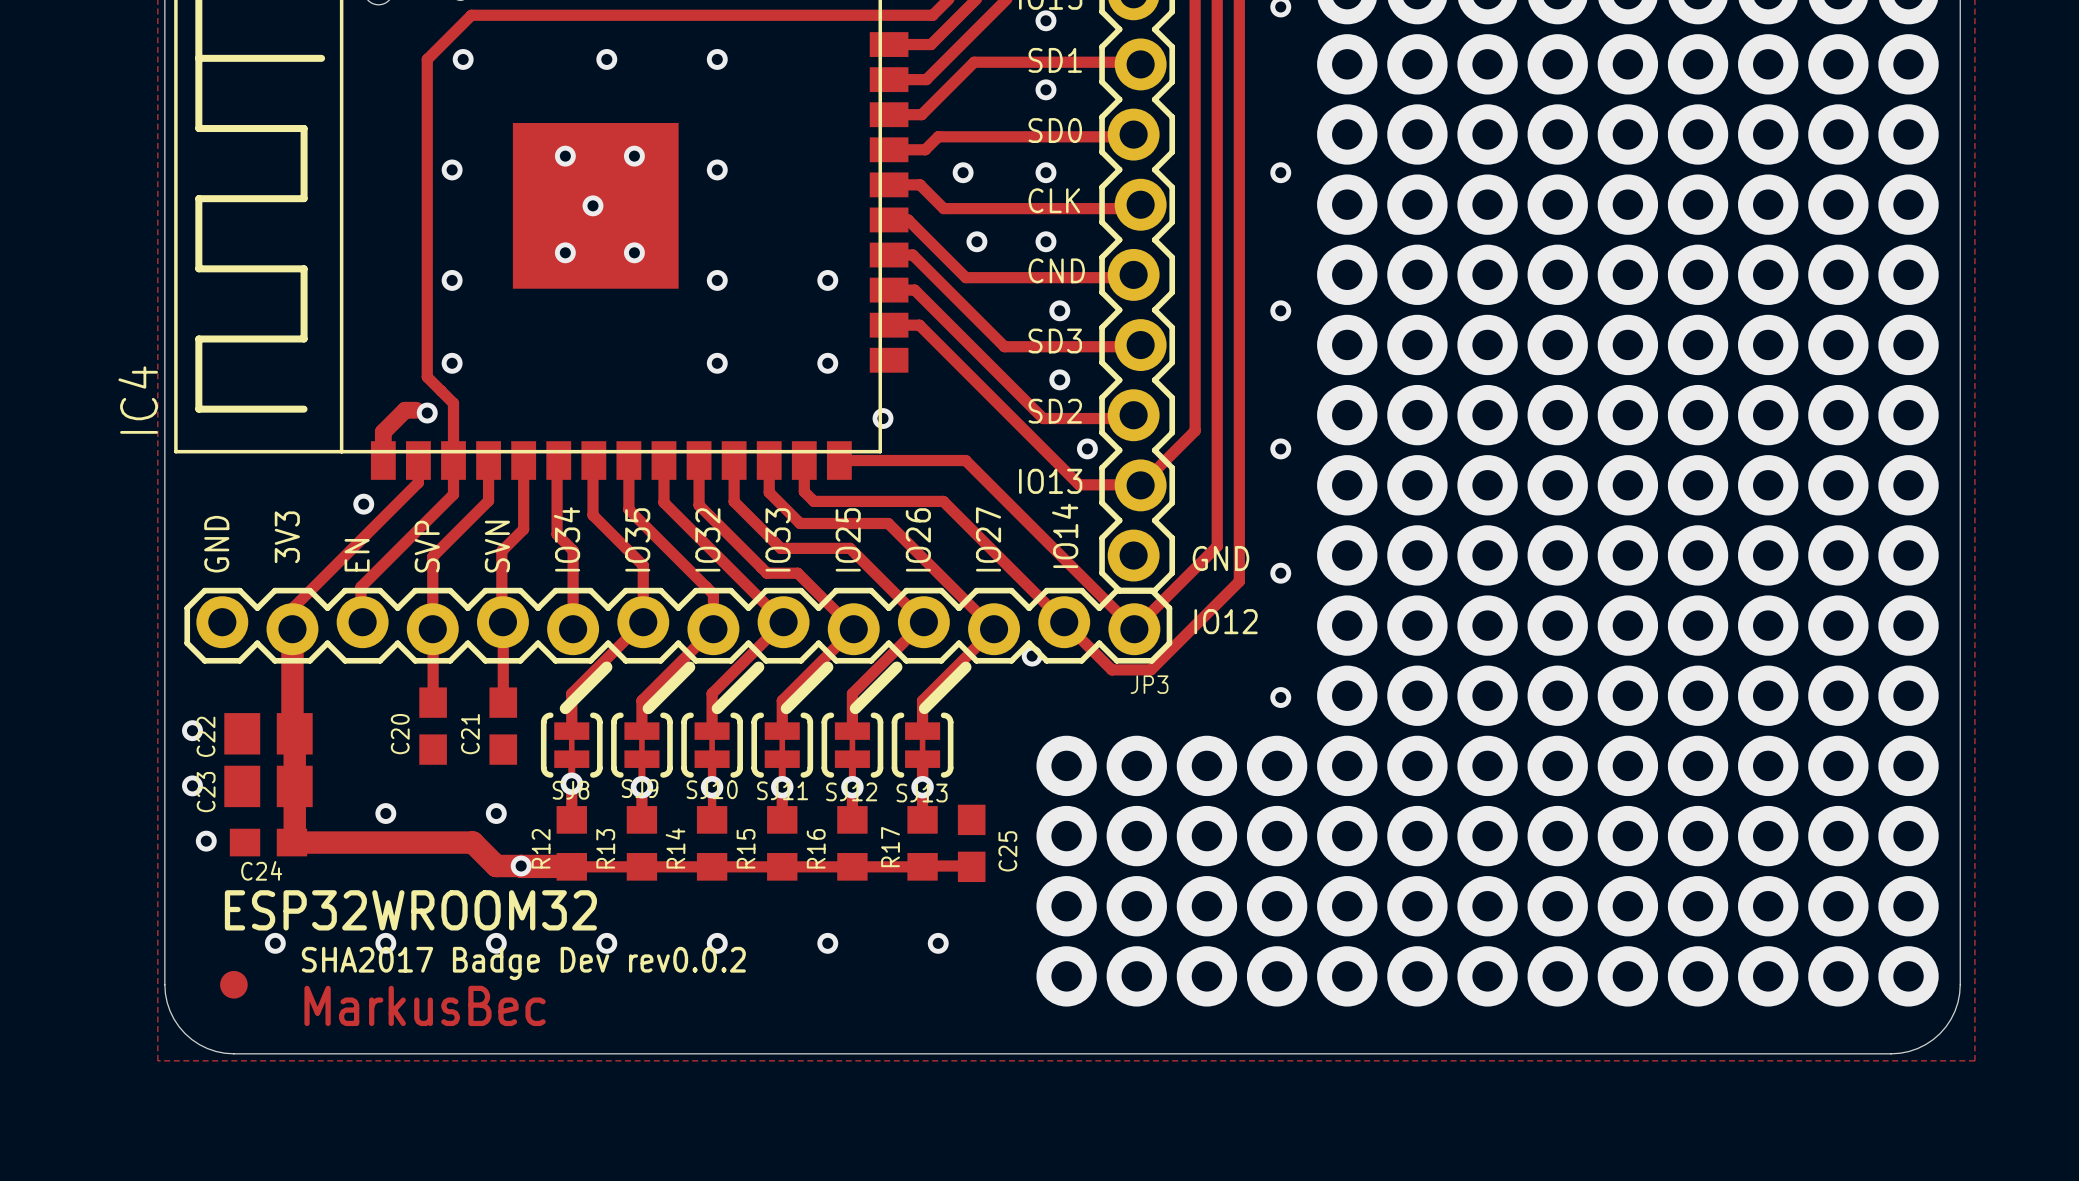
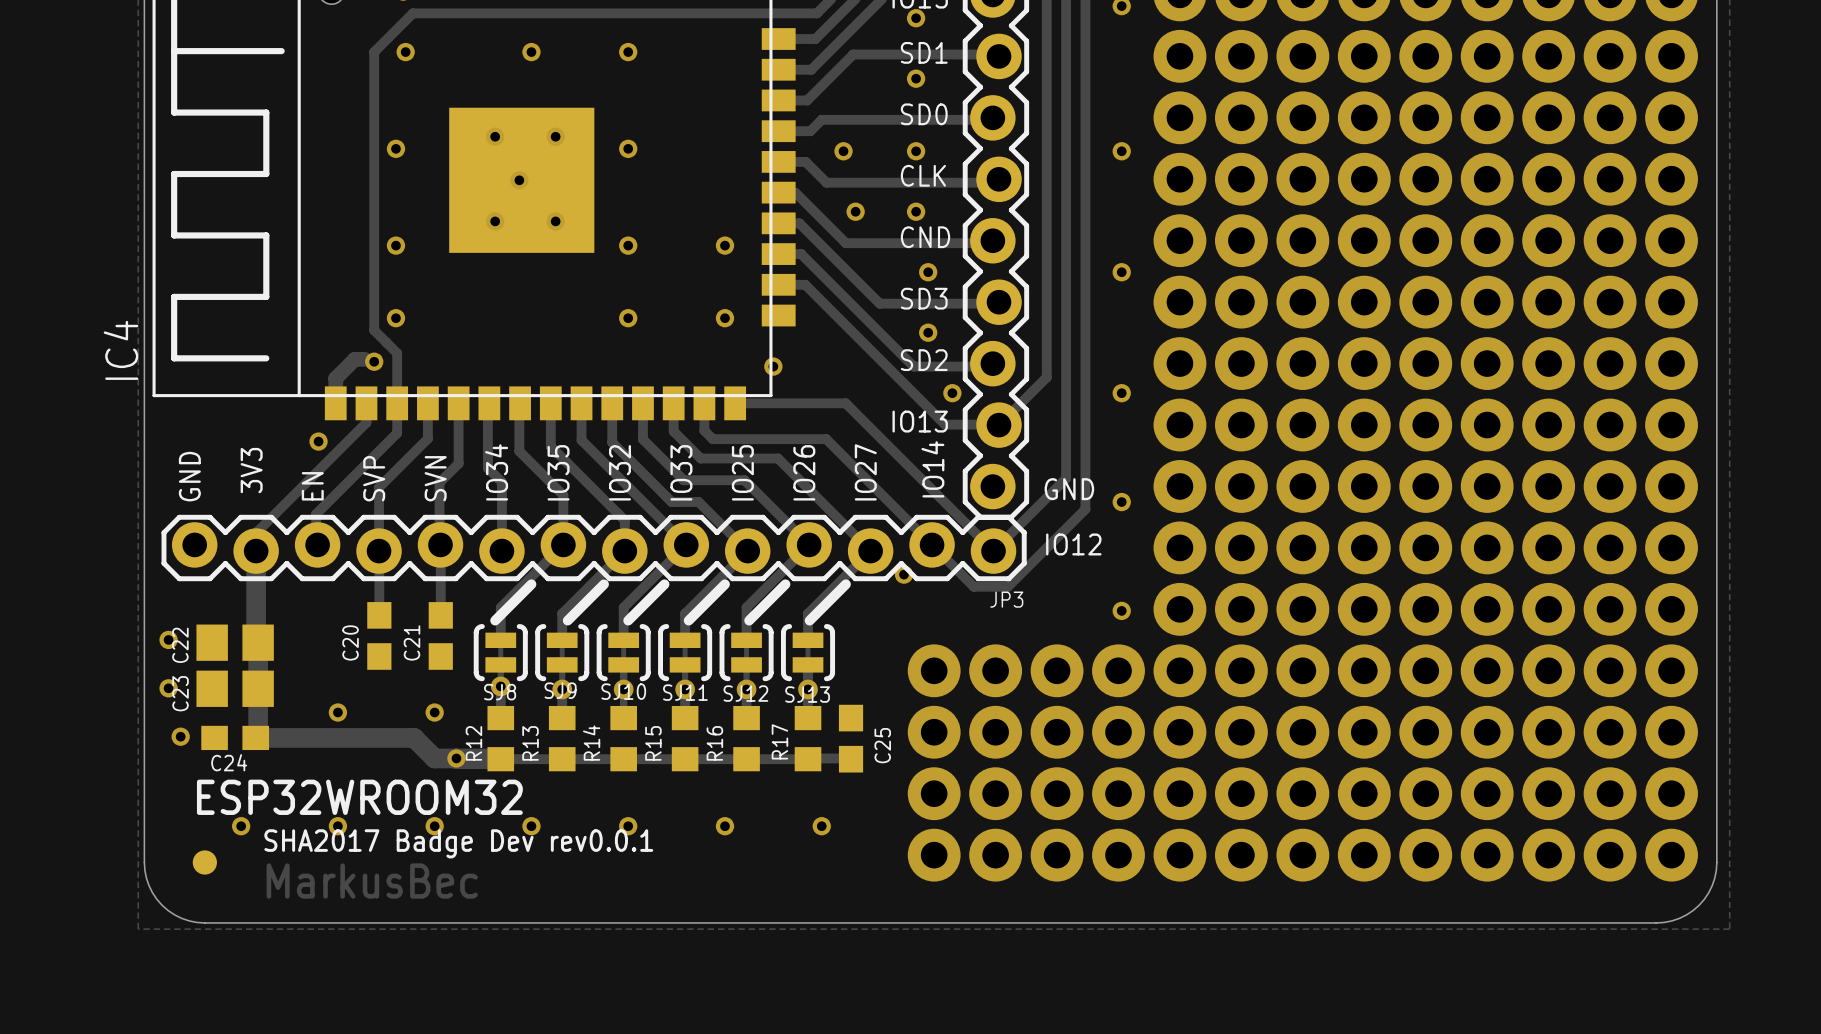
text: SHA2017 Badge Dev rev0.0.2 (523, 963) -> SHA2017 Badge Dev rev0.0.1 (458, 843)

